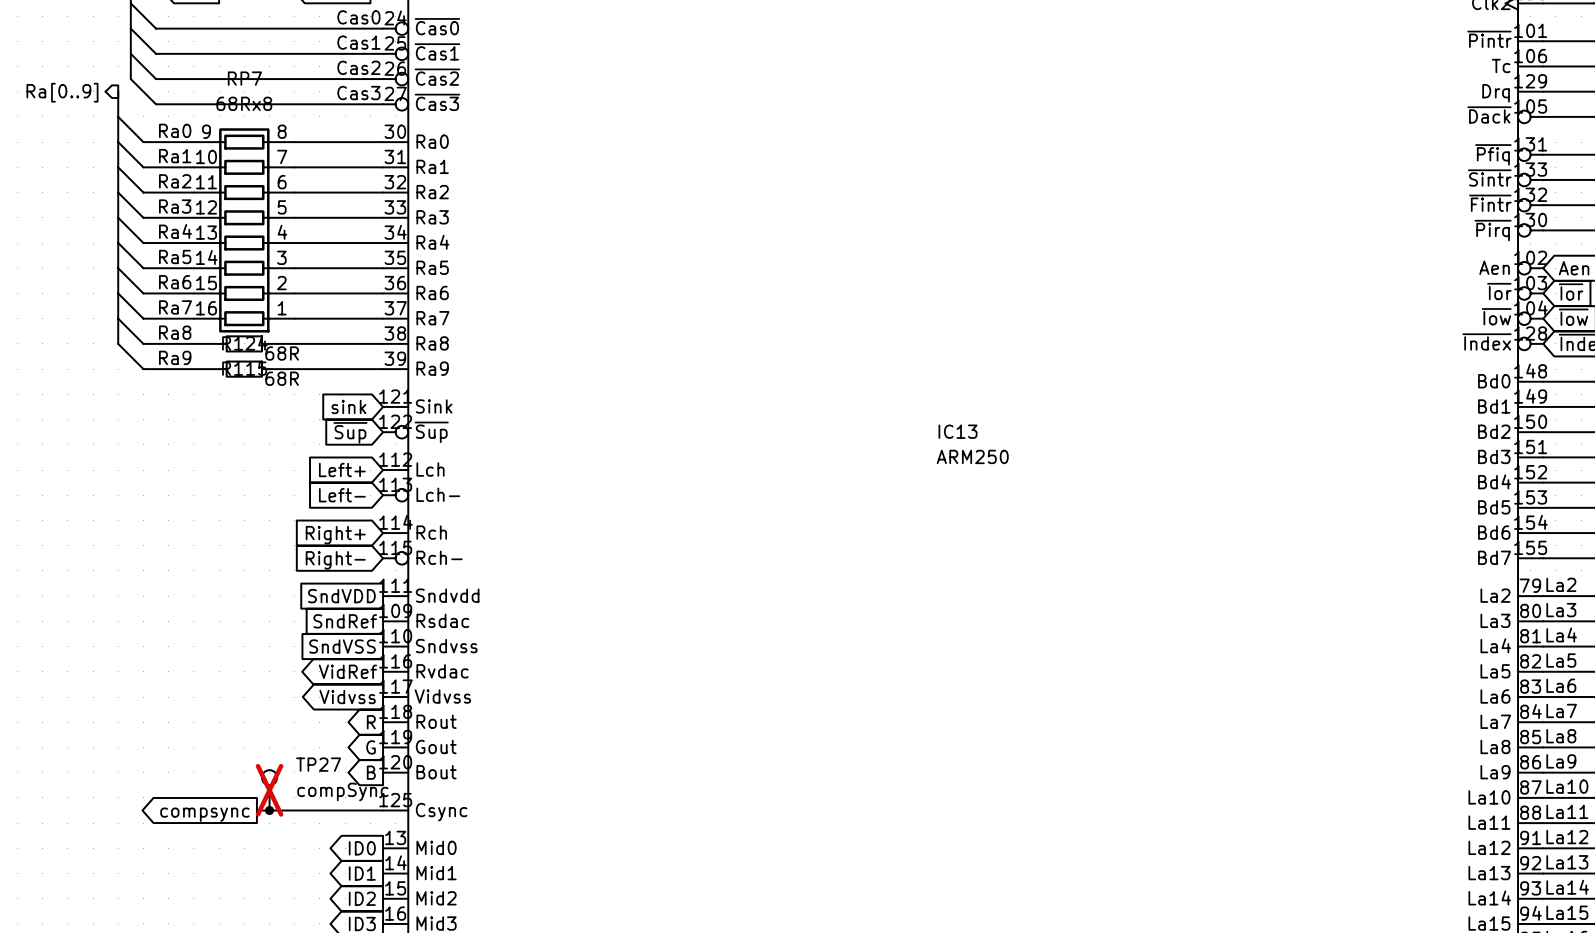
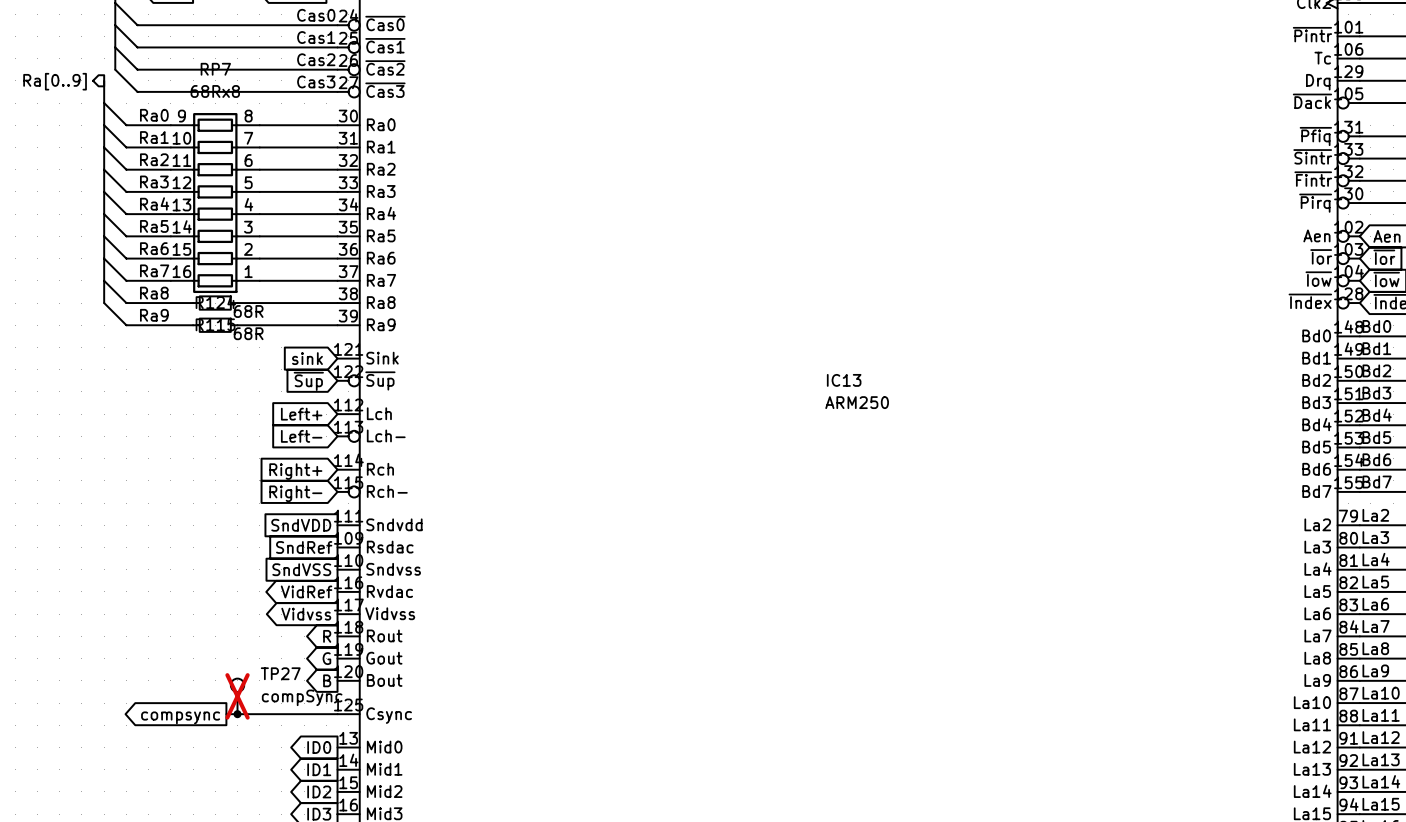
label: none -> Bd0 (1376, 326)
label: none -> Bd1 (1376, 348)
label: none -> Bd2 (1376, 370)
label: none -> Bd3 (1376, 393)
label: none -> Bd4 (1377, 415)
label: none -> Bd5 (1376, 437)
label: none -> Bd6 (1376, 459)
label: none -> Bd7 (1377, 482)

